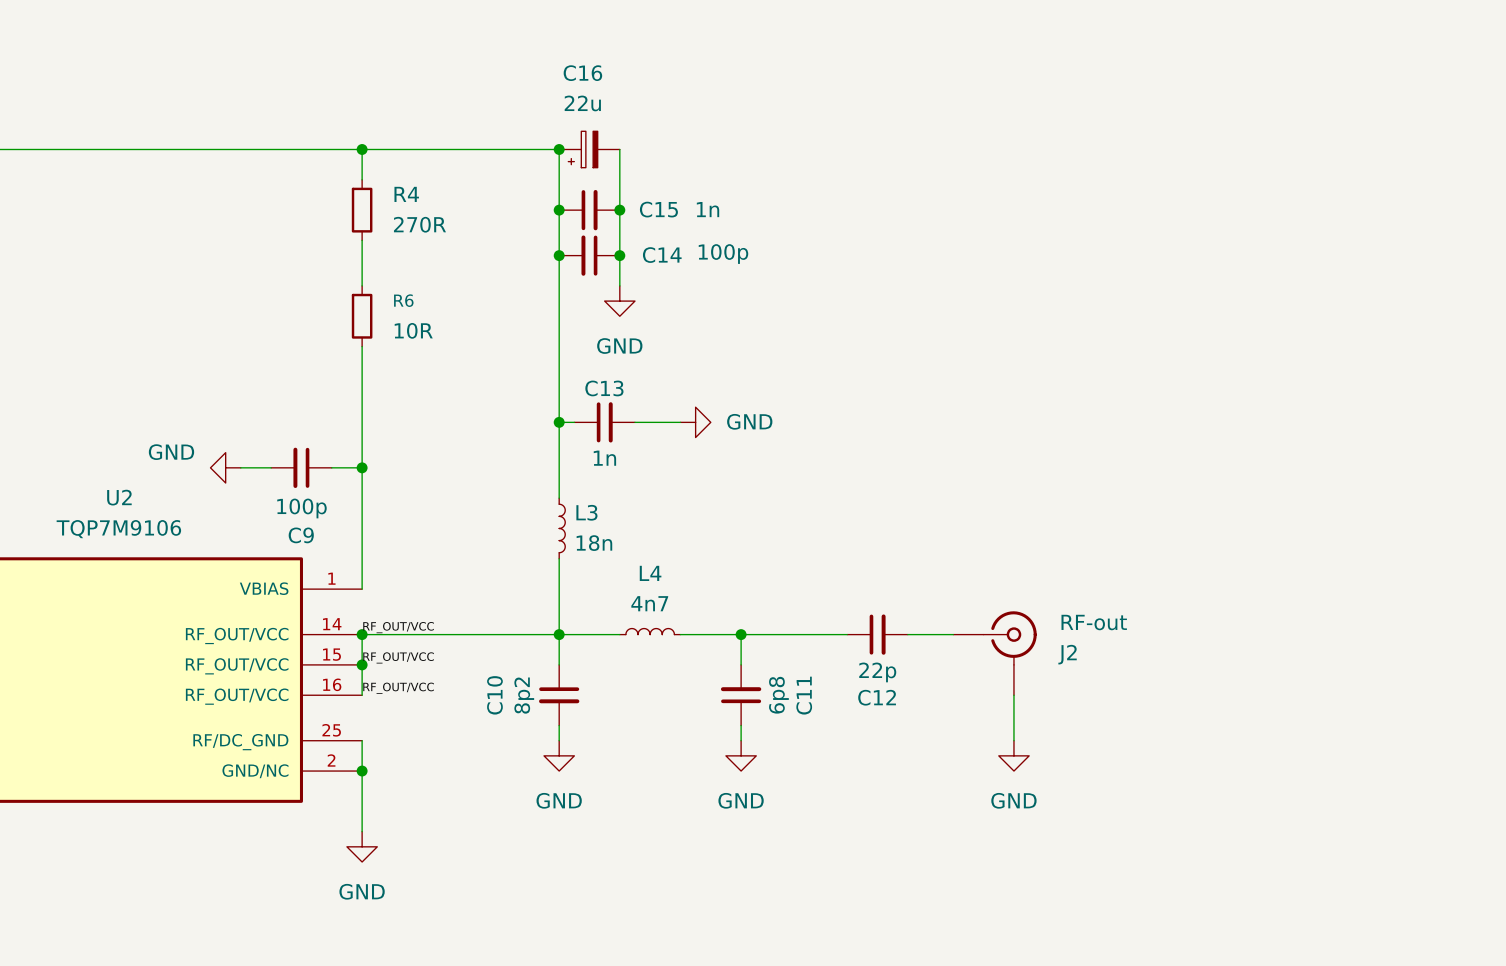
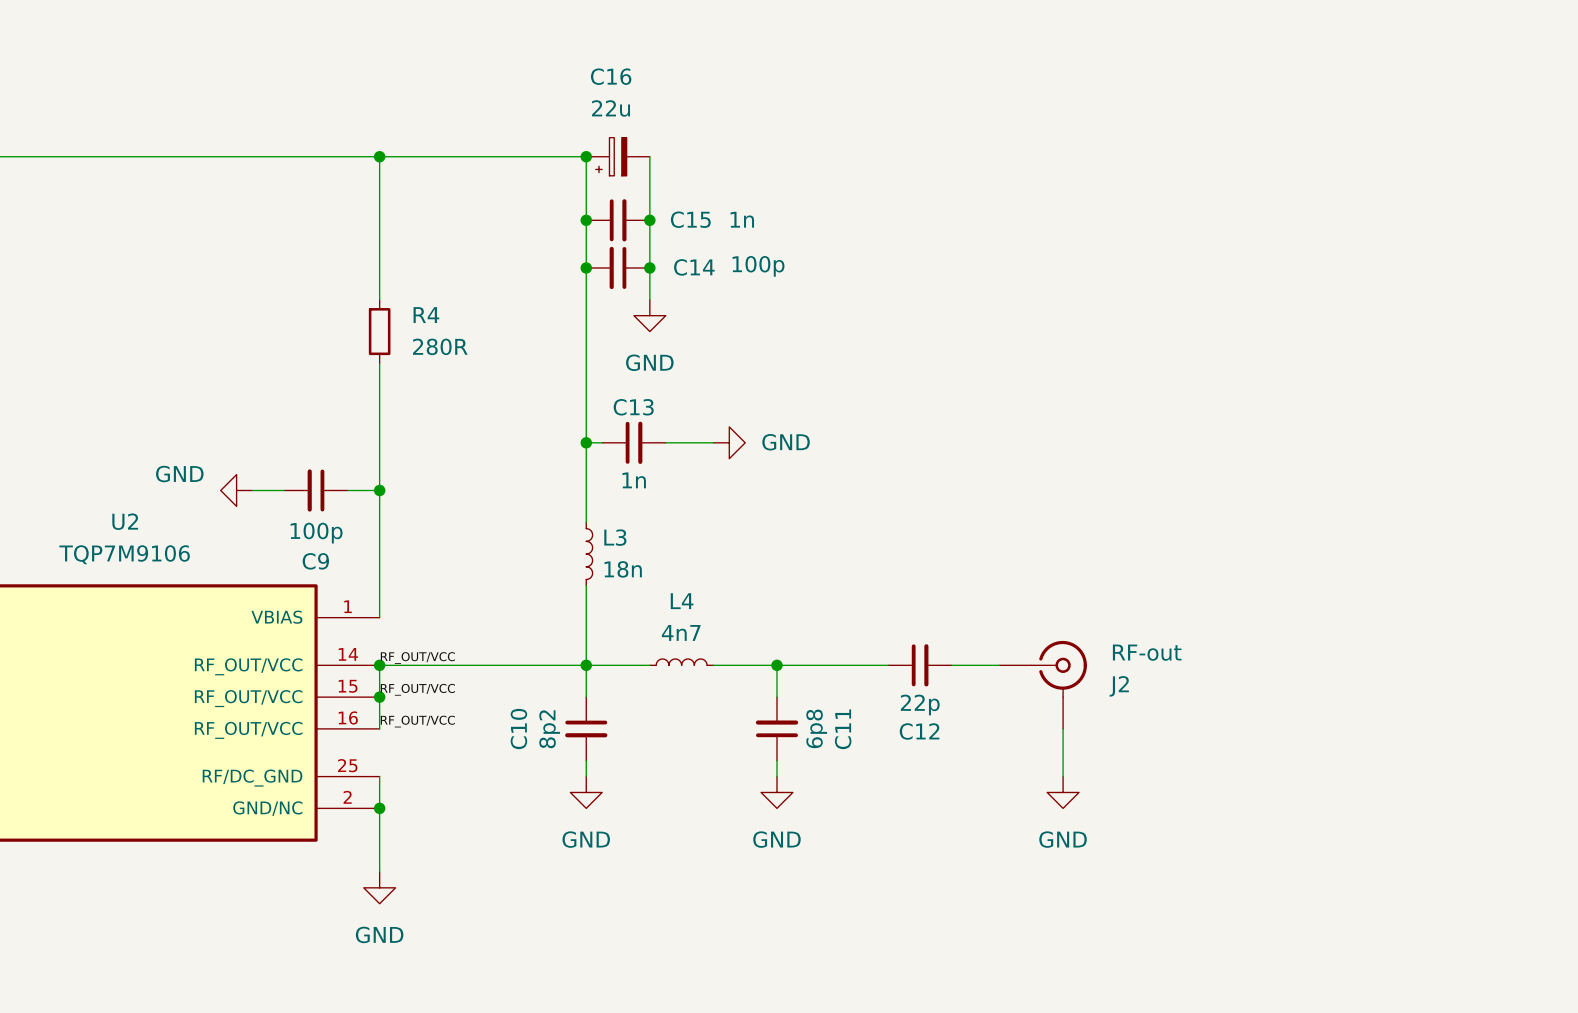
wire: none -> (379, 188) (379, 252)
R4: 270R (362, 210) -> none
R6 name: R6 (403, 300) -> R4 (426, 315)
R6 value: 10R (413, 330) -> 280R (440, 346)

